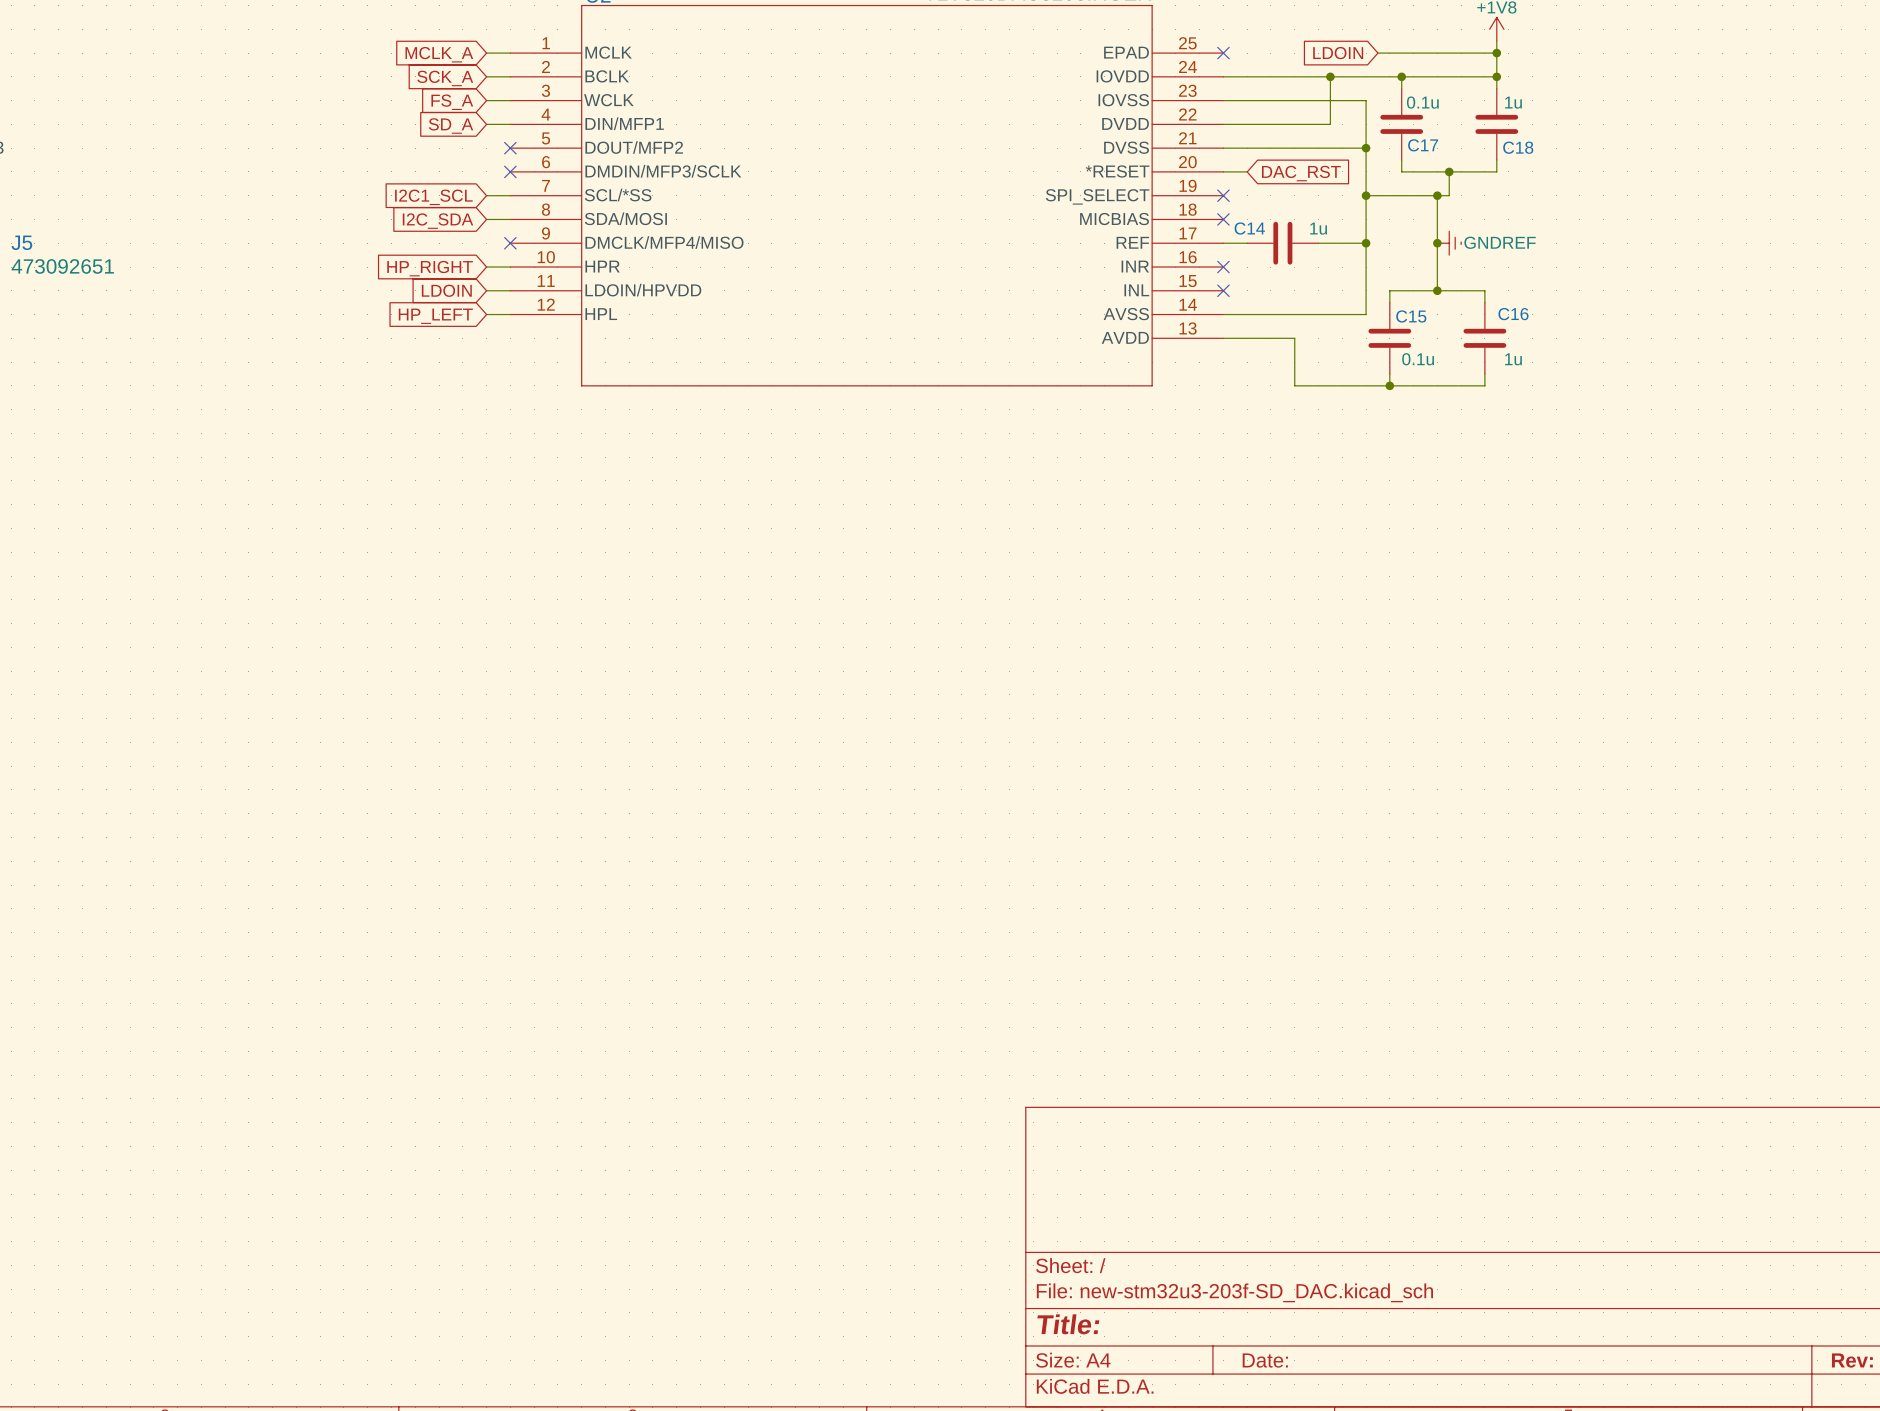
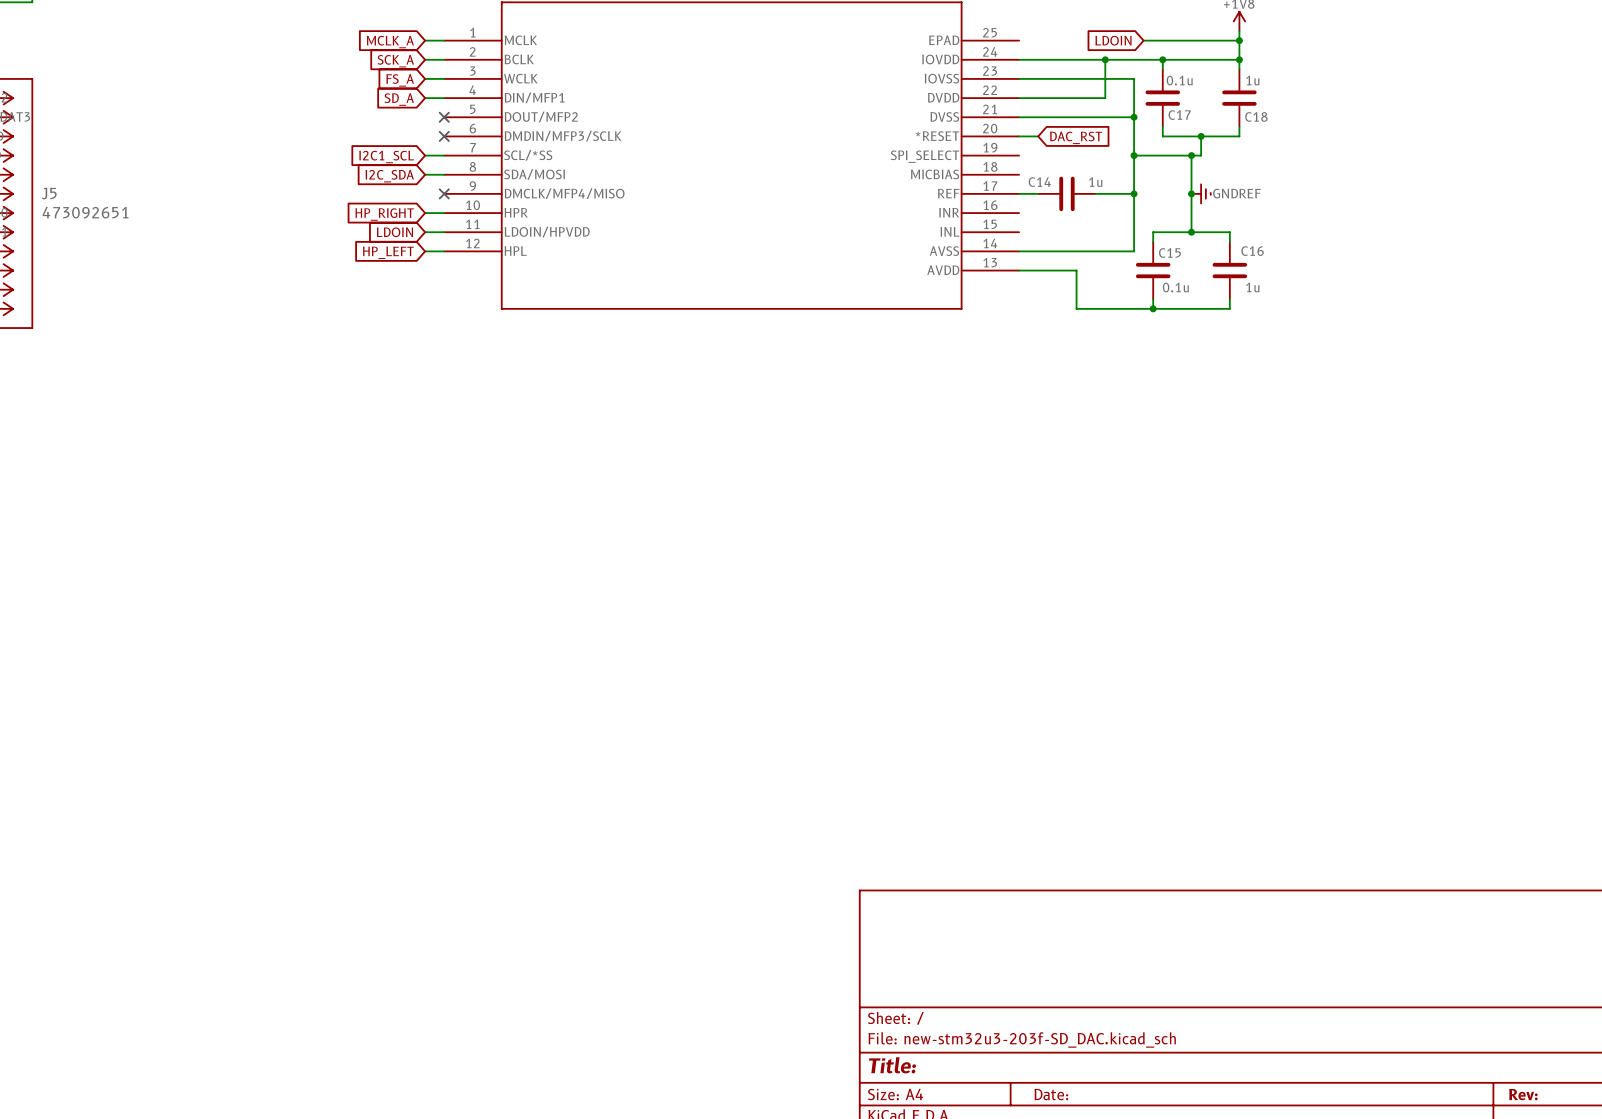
no-connect mark: (1223, 53) -> none
no-connect mark: (1223, 195) -> none
no-connect mark: (1223, 219) -> none
no-connect mark: (1223, 267) -> none
no-connect mark: (1223, 290) -> none

